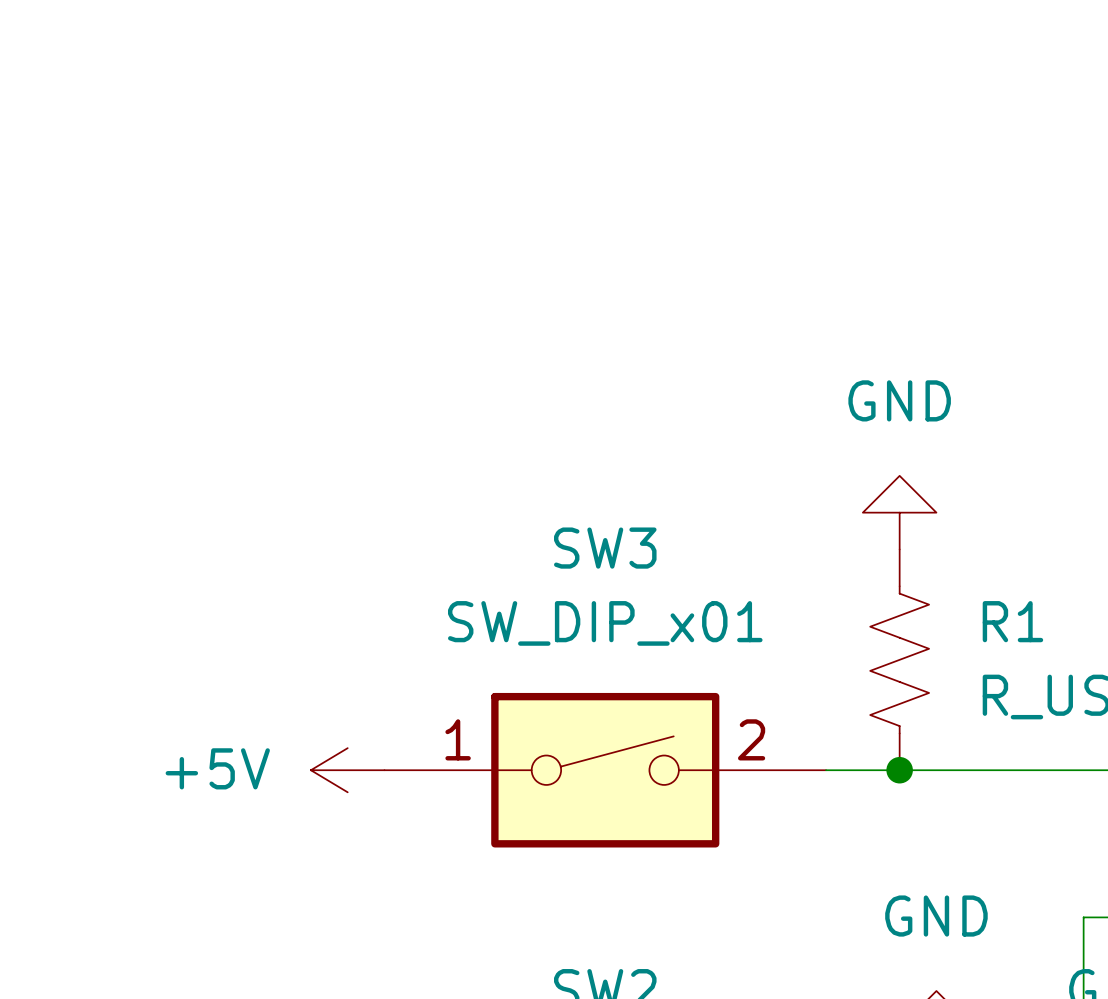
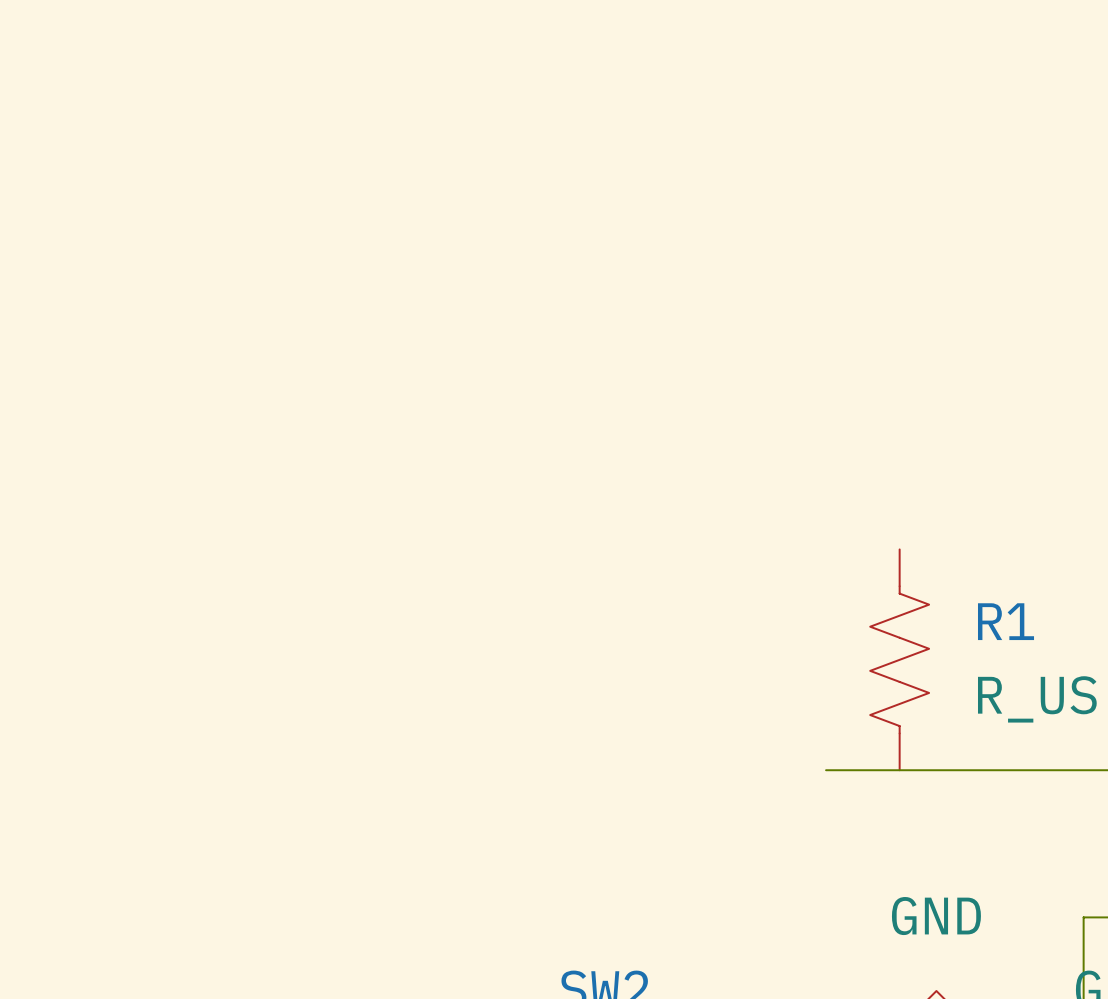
power symbol: GND (899, 512) -> none
power symbol: +5V (347, 770) -> none
SW3: SW_DIP_x01 (605, 770) -> none
junction: (899, 770) -> none

